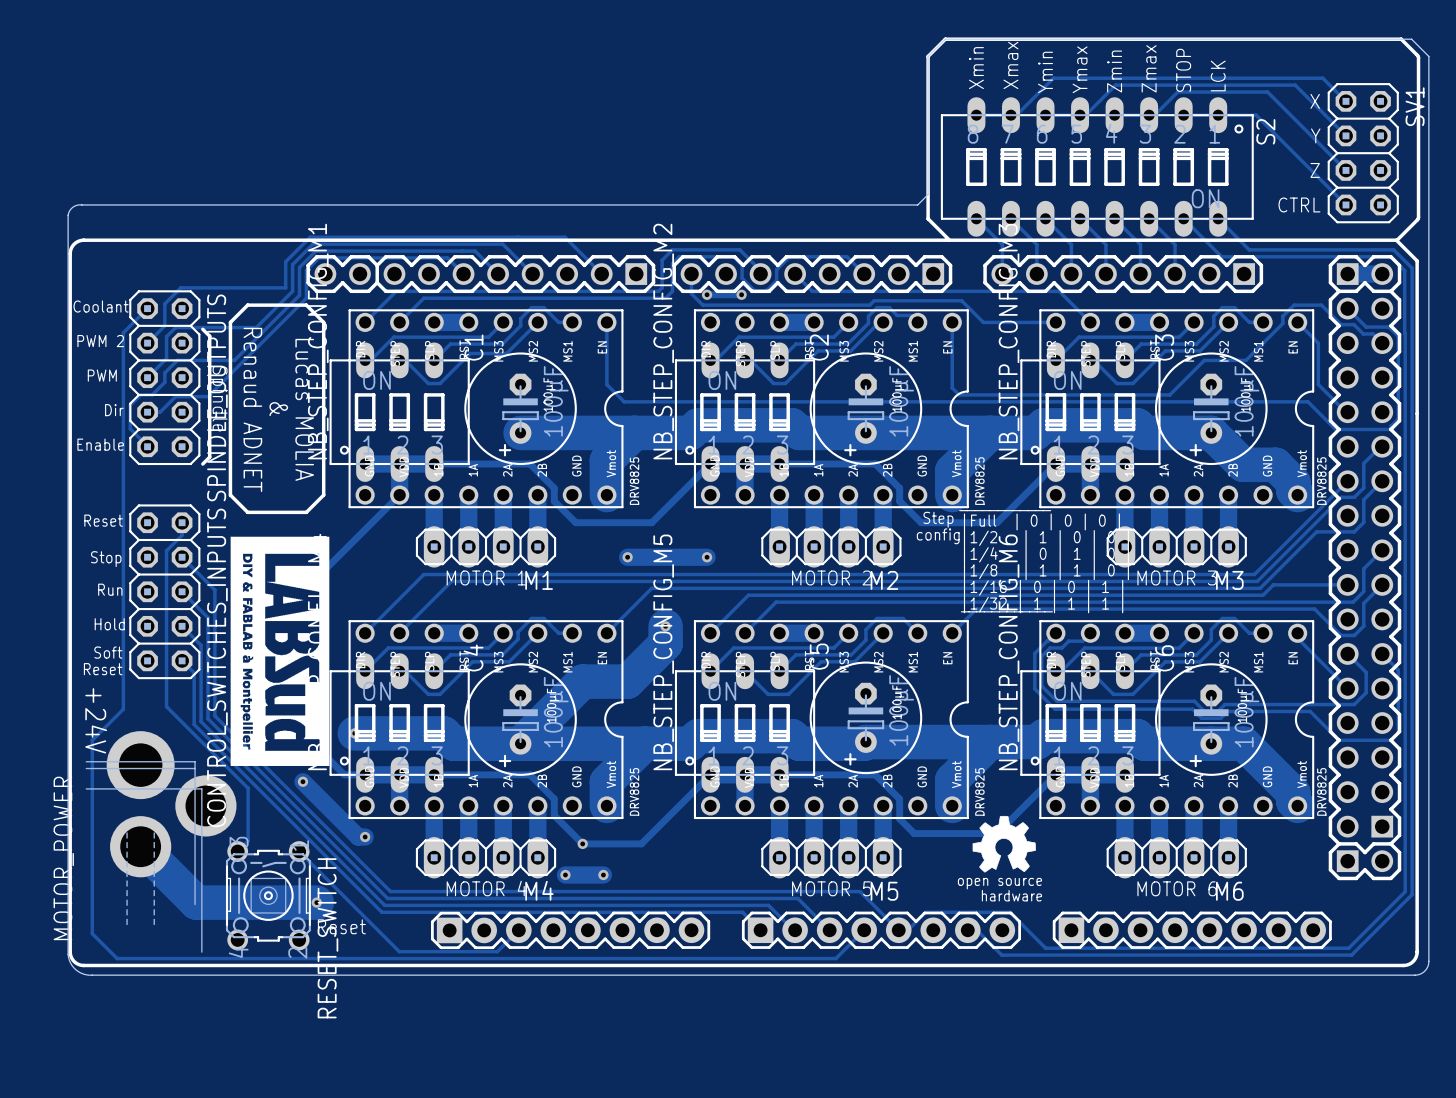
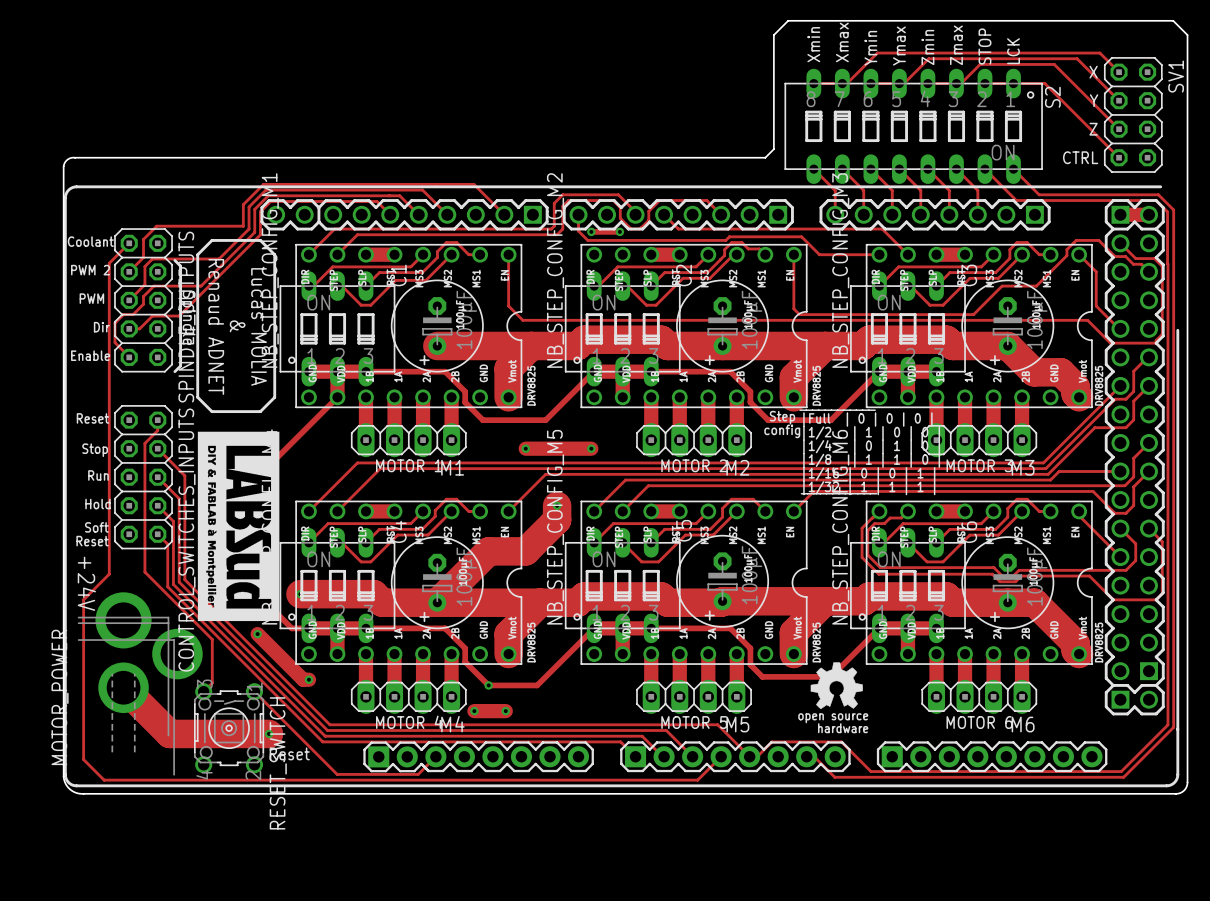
part footprint: [68, 238, 1419, 968] -> [63, 185, 1180, 788]
line: (948, 239) (928, 218) (928, 56) (945, 39) (1401, 39) (1418, 57) (1418, 217) (1397, 239) -> none

